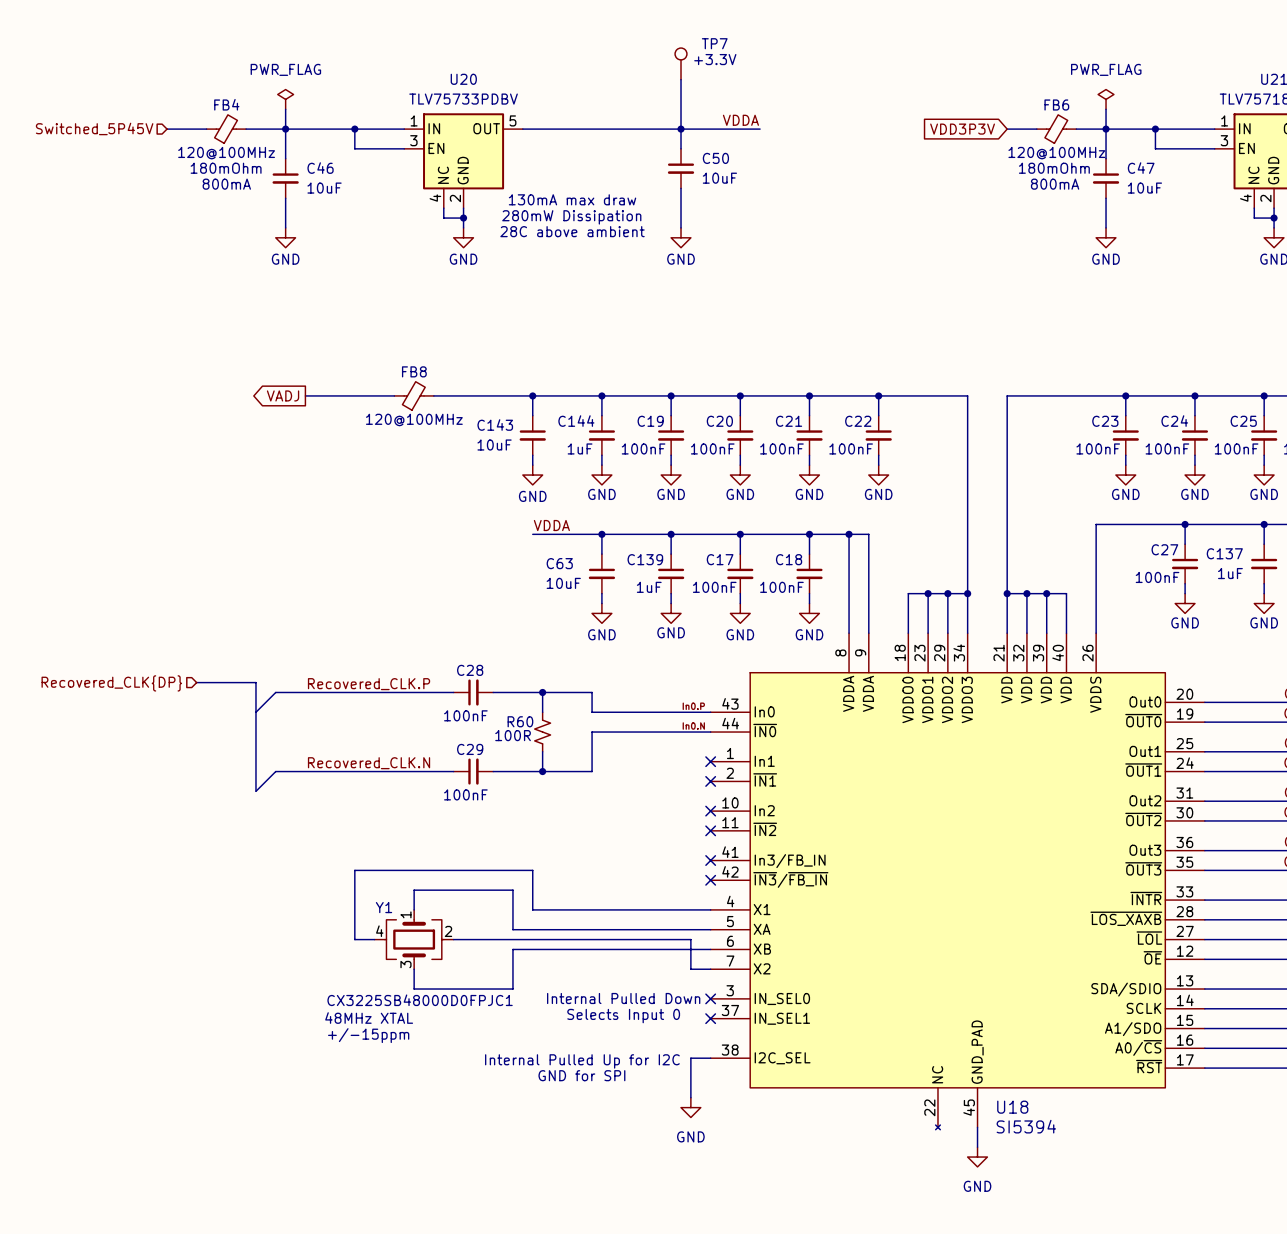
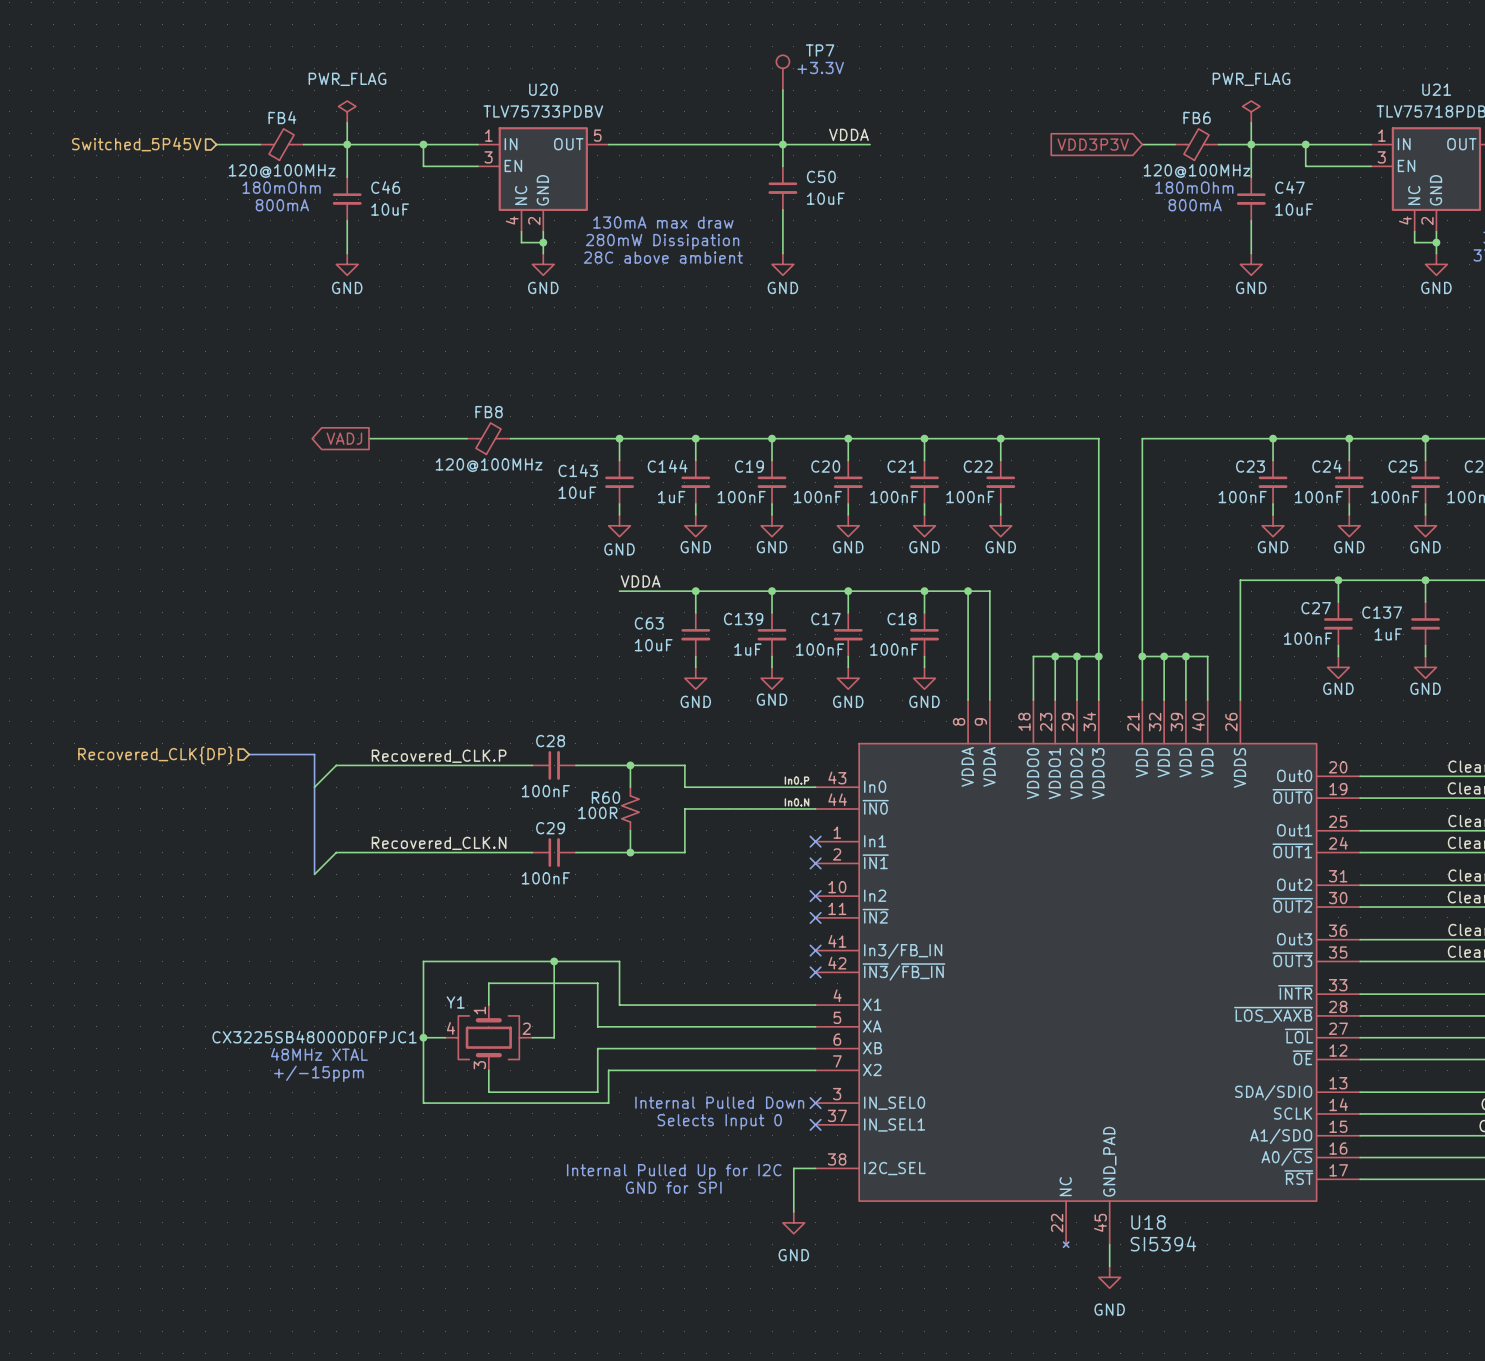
wire: none -> (554, 961) (554, 1037)
junction: none -> (554, 961)
junction: none -> (423, 1037)
wire: (473, 939) (690, 939) (690, 969) -> (423, 1037) (423, 1103) (608, 1103) (608, 1070) (793, 1070)
Y1 value position: CX3225SB48000D0FPJC1 (420, 1000) -> CX3225SB48000D0FPJC1 (314, 1037)
text position: 48MHz XTAL (369, 1018) -> 48MHz XTAL (319, 1054)
text position: +/-15ppm (368, 1035) -> +/-15ppm (318, 1073)

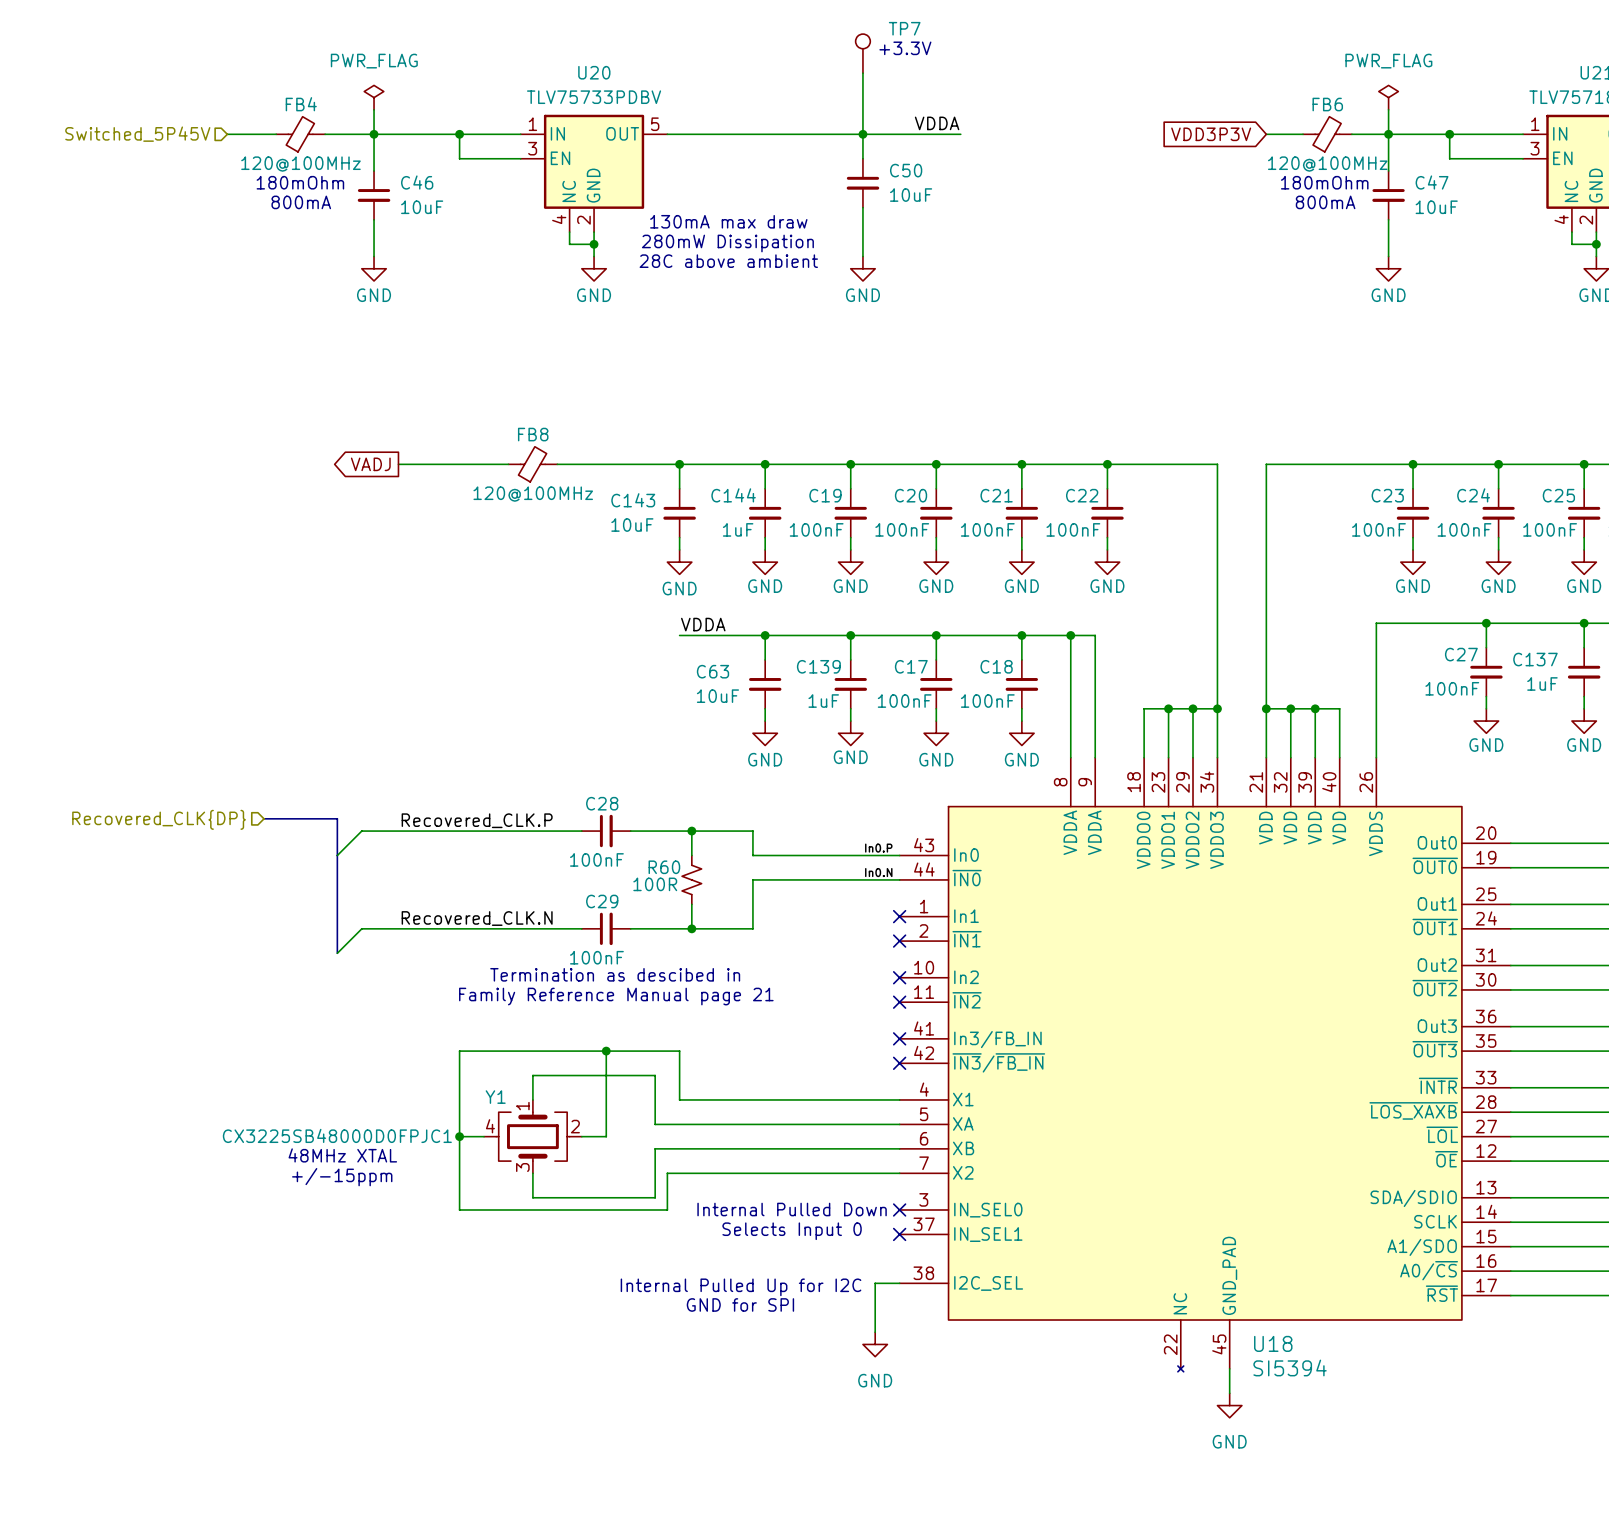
text: none -> Termination as descibed in (615, 974)
text: none -> Family Reference Manual page 21 (616, 996)

